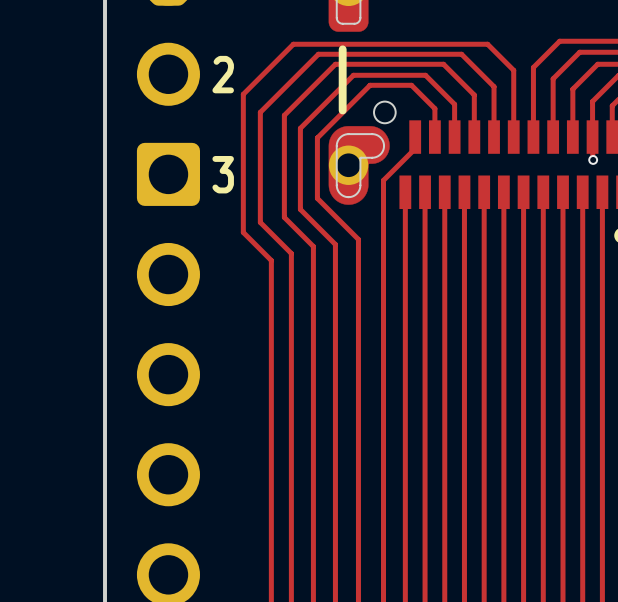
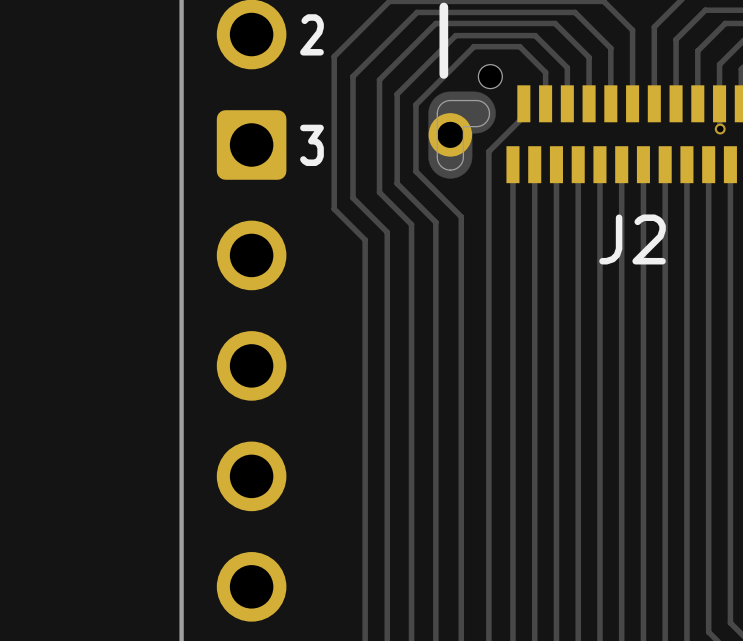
J2 name: none -> J2 (632, 239)

